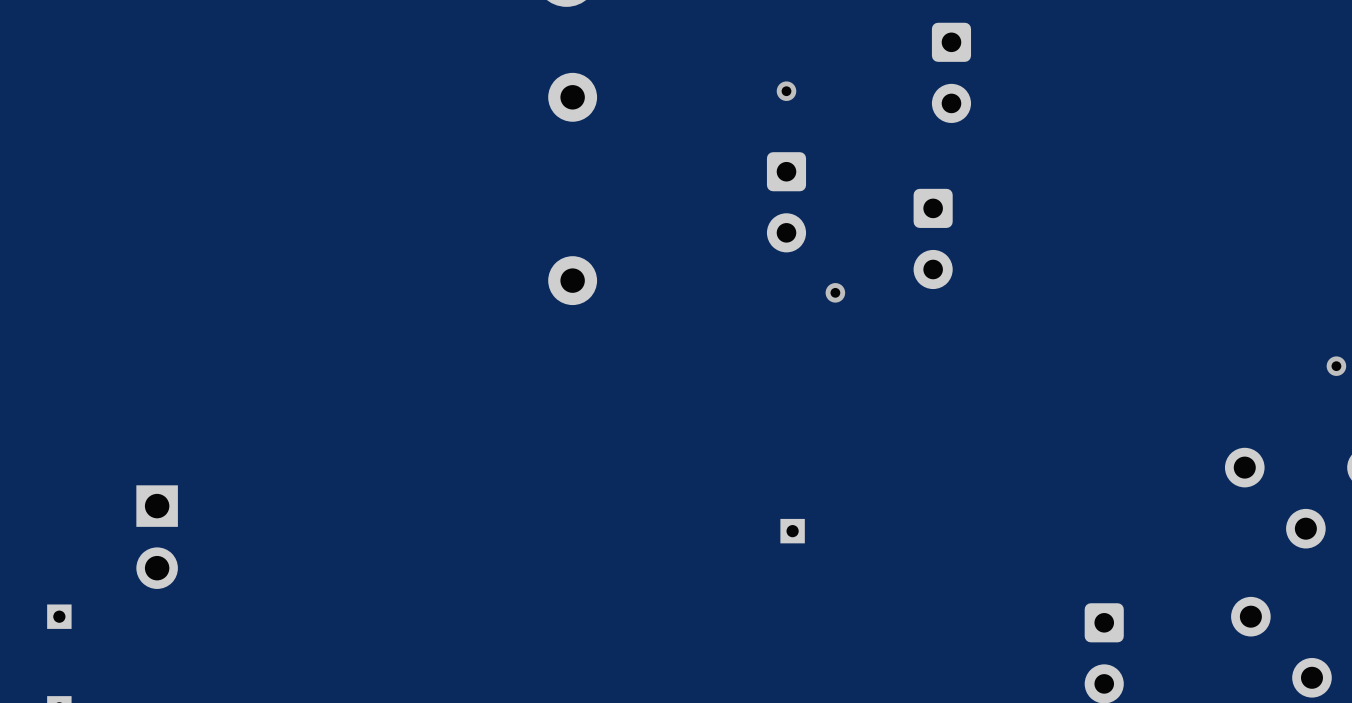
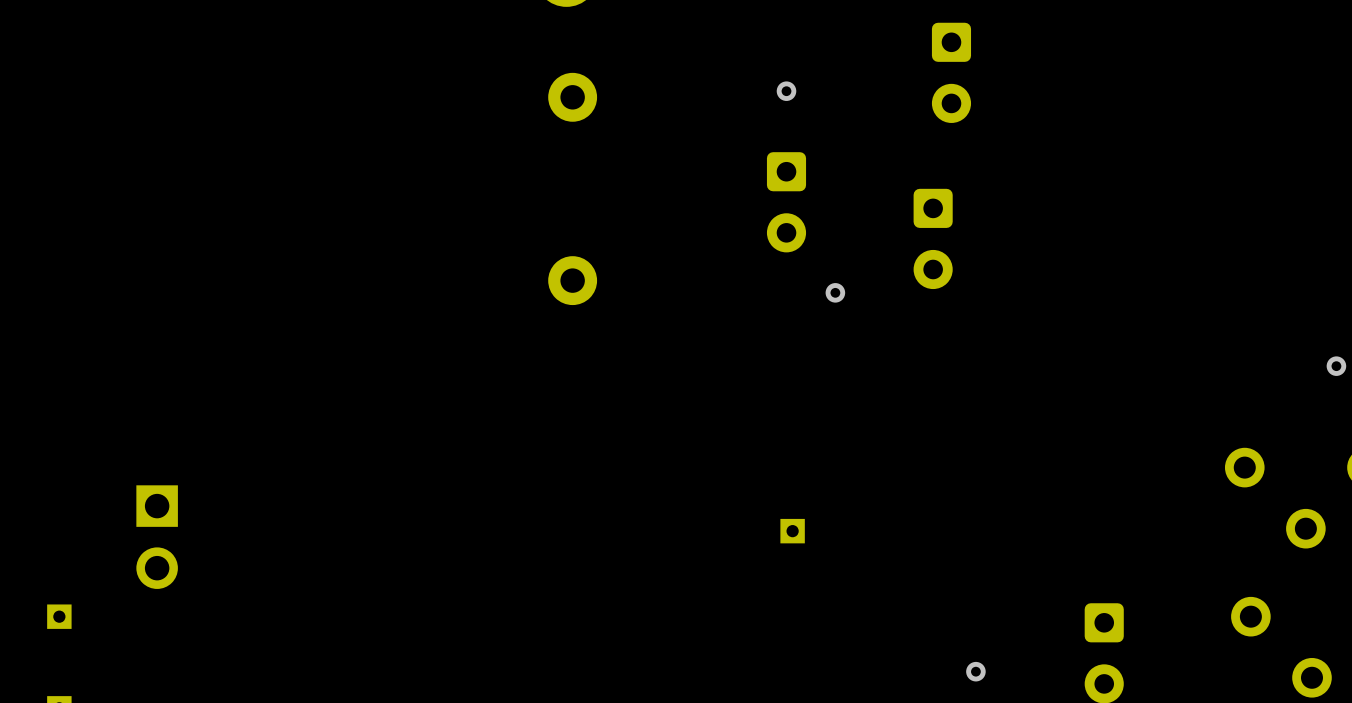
via: none -> (975, 671)

